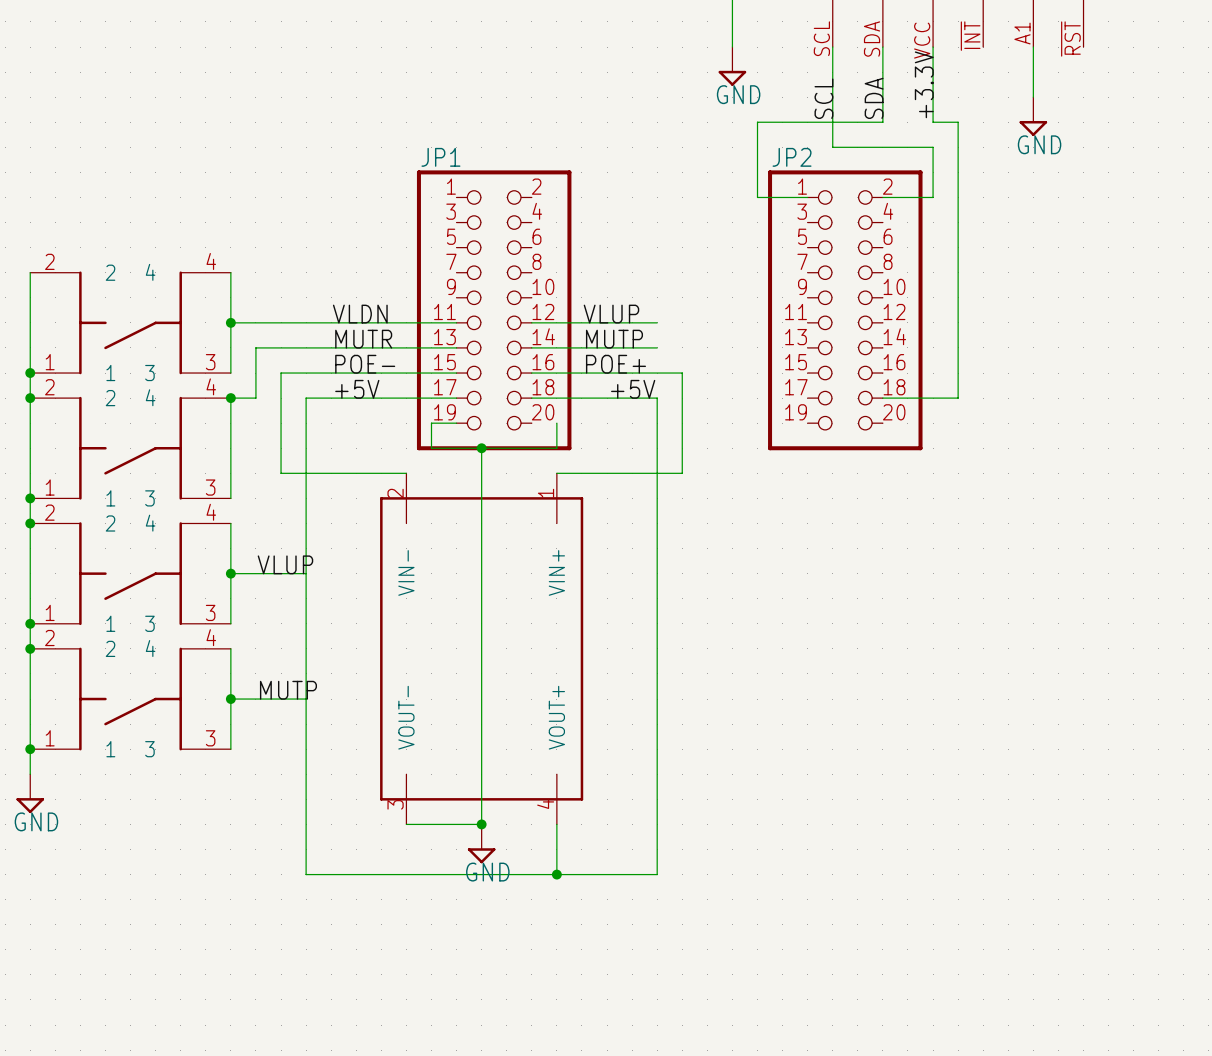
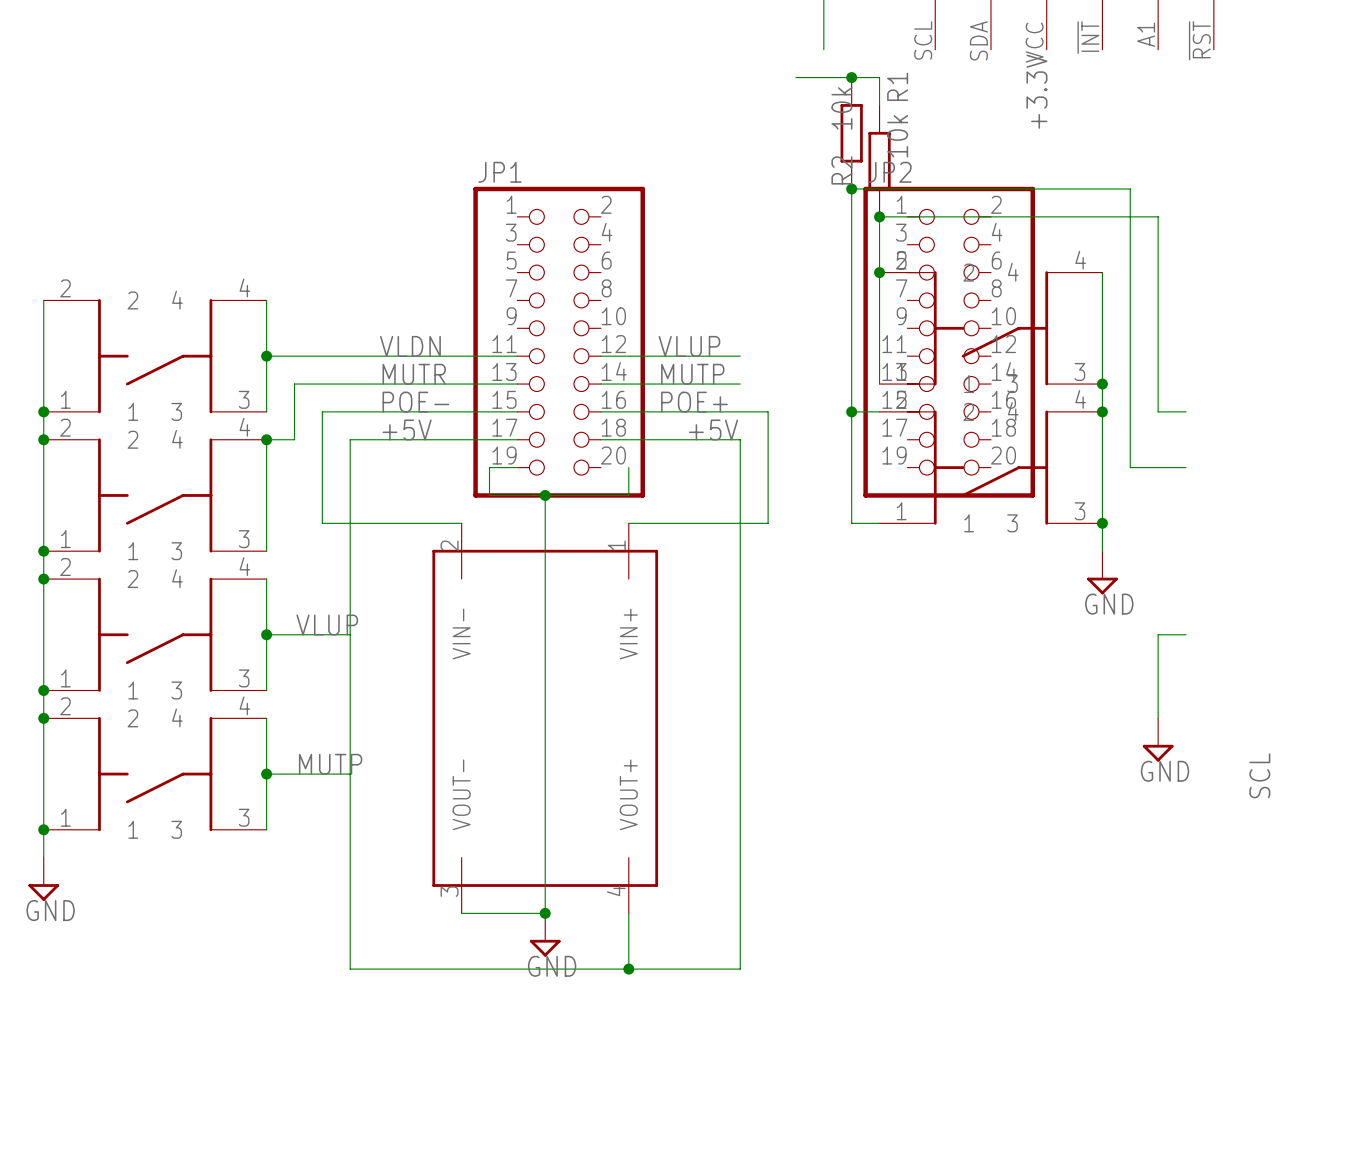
wire: (832, 47) (832, 147) (933, 147) (933, 197) -> (1186, 411) (1158, 411) (1158, 216) (1046, 216)
wire: (882, 47) (882, 122) (757, 122) (757, 172) -> (1186, 467) (1130, 467) (1130, 189) (851, 189)
wire: (933, 47) (933, 122) (958, 122) (958, 398) (882, 398) -> none
wire: (1033, 47) (1033, 97) -> none
power symbol: GND (732, 66) -> none
wire: none -> (795, 77) (879, 77) (879, 105)
junction: none -> (851, 77)
label: SCL (823, 98) -> none
label: SDA (874, 98) -> none
power symbol: GND (1033, 116) -> none
R2: none -> 10k (851, 133)
R1: none -> 10k (879, 161)
junction: none -> (851, 189)
wire: (757, 197) (782, 197) -> (879, 384) (879, 216)
wire: none -> (851, 216) (851, 523) (879, 523)
junction: none -> (879, 216)
wire: none -> (907, 216) (990, 216)
junction: none -> (879, 272)
wire: none -> (1102, 272) (1102, 551)
part: none -> (990, 328)
junction: none -> (1102, 384)
wire: none -> (851, 411) (879, 411)
junction: none -> (851, 411)
junction: none -> (1102, 411)
part: none -> (990, 467)
junction: none -> (1102, 523)
power symbol: none -> GND (1102, 572)
wire: none -> (1186, 634) (1158, 634) (1158, 718)
power symbol: none -> GND (1158, 739)
label: none -> SCL (1259, 775)

